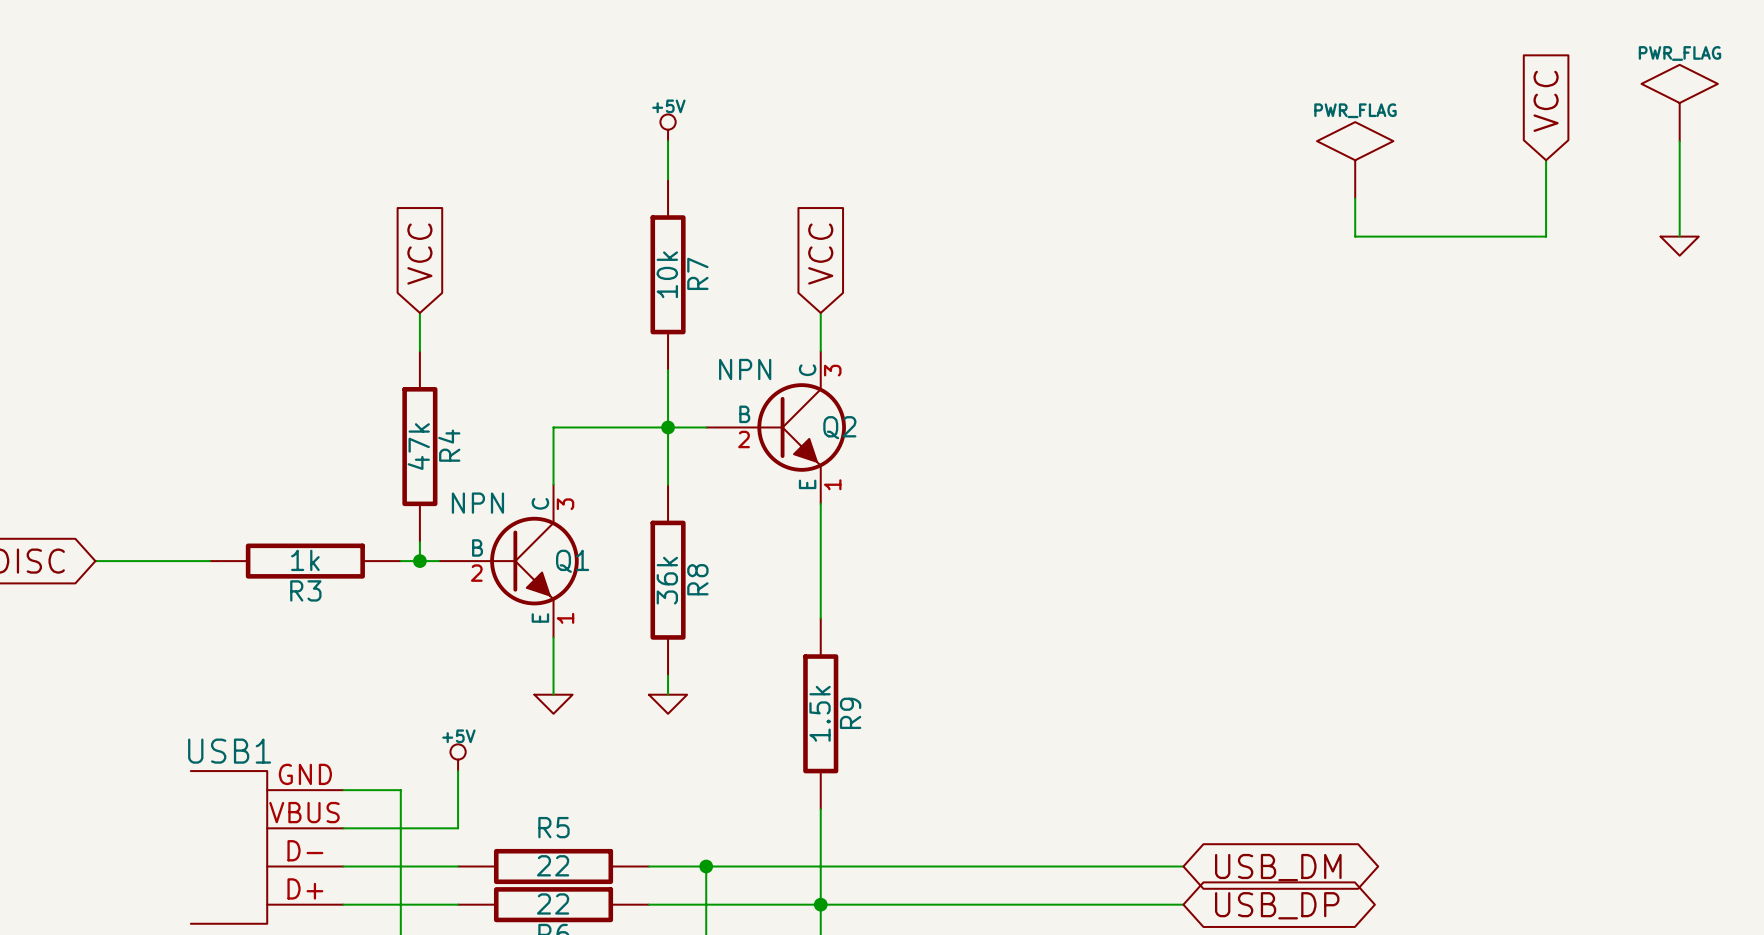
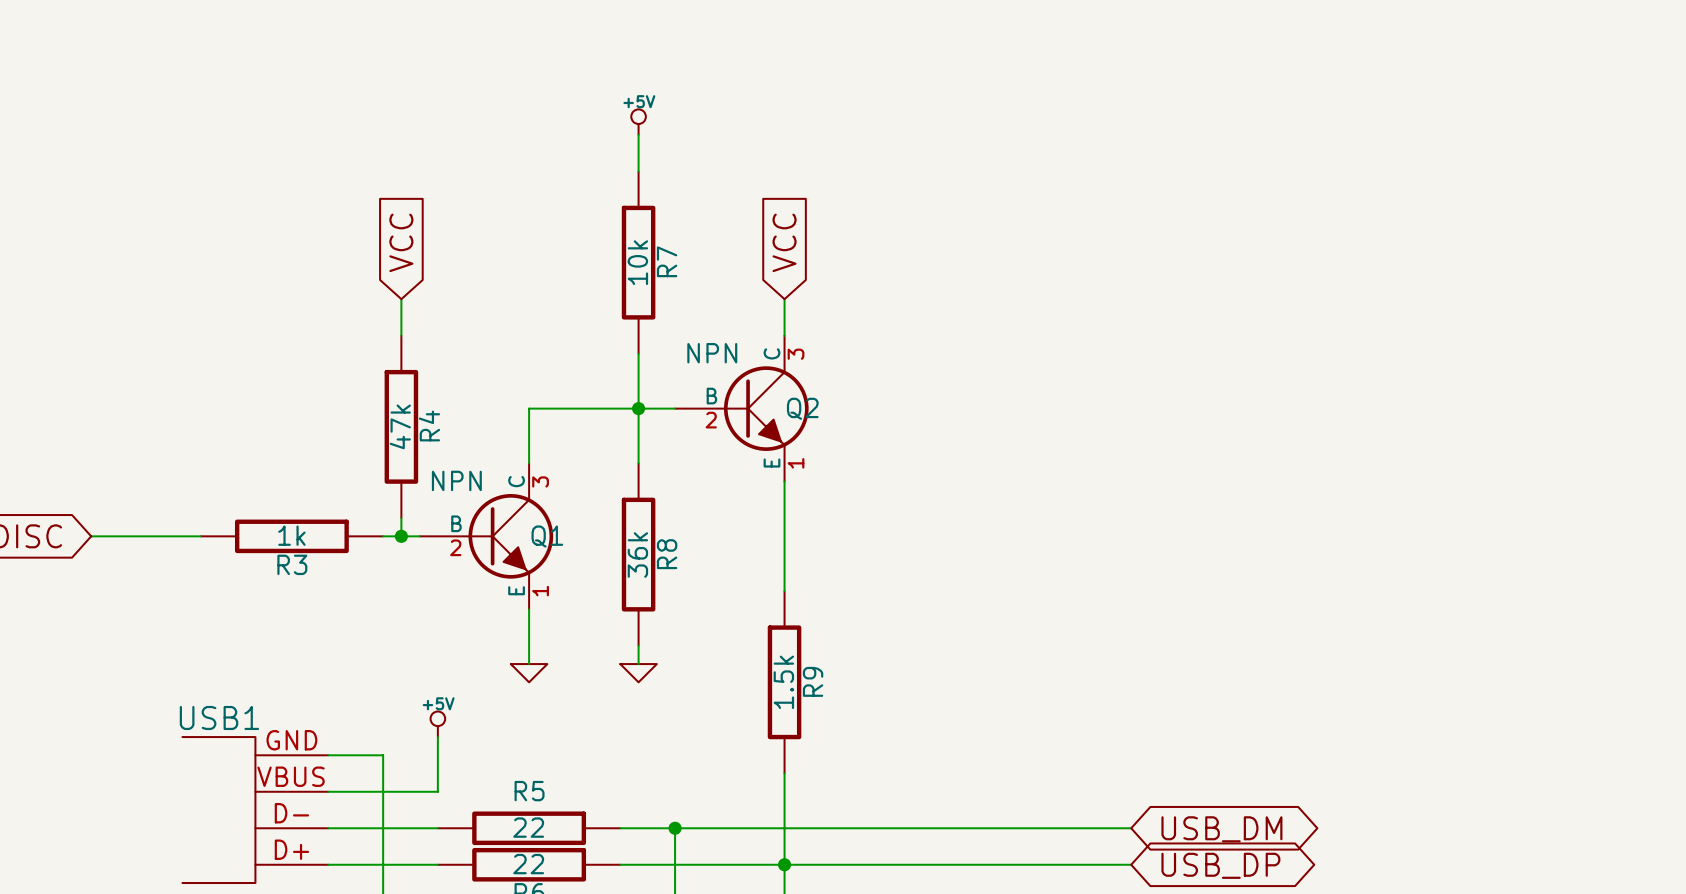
global label: VCC (1546, 101) -> none
power symbol: PWR_FLAG (1679, 102) -> none
wire: (1679, 141) (1679, 236) -> none
power symbol: PWR_FLAG (1355, 160) -> none
wire: (1546, 160) (1546, 236) (1355, 236) (1355, 198) -> none
power symbol: (1679, 246) -> none

